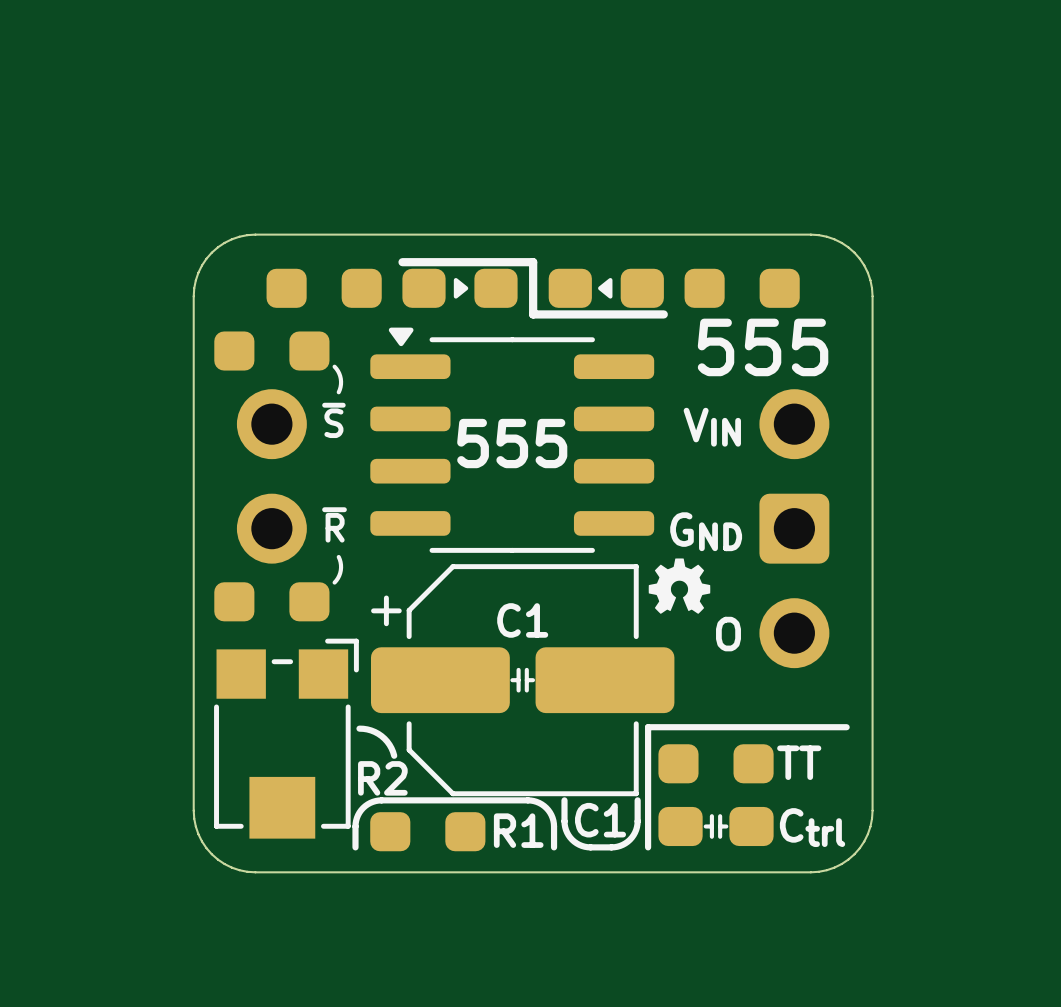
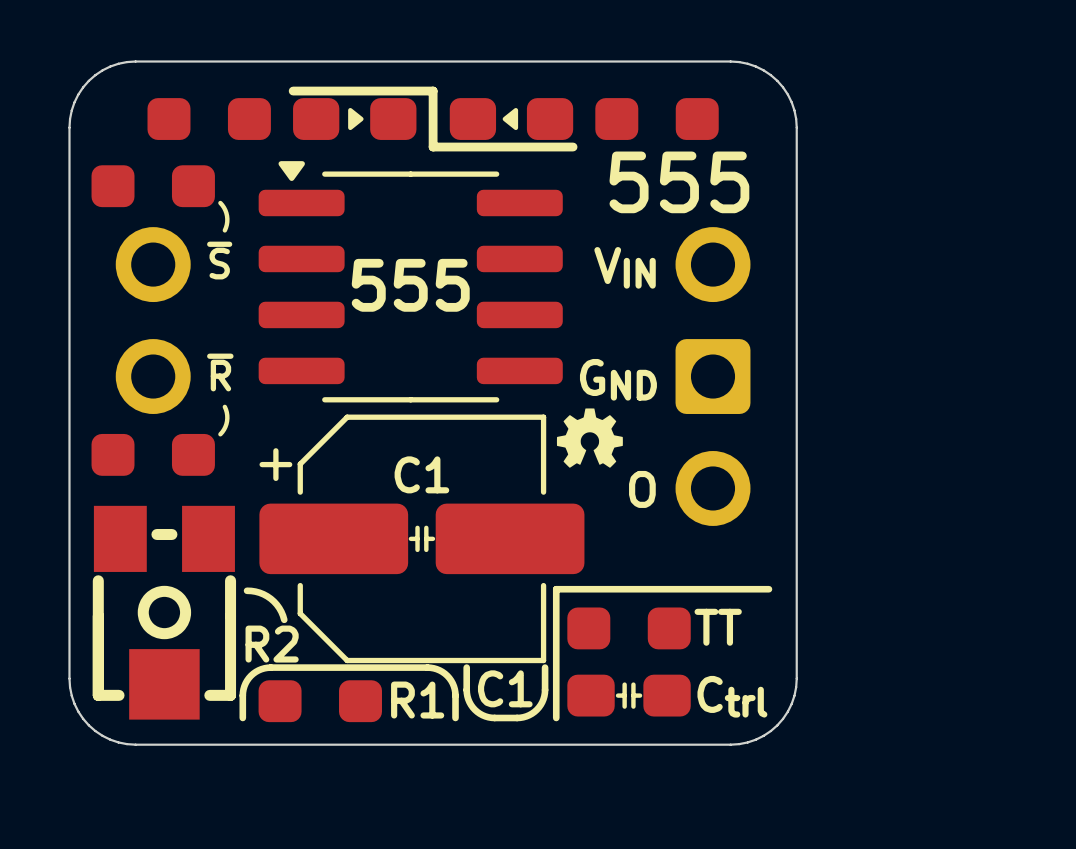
part footprint: [214, 638, 359, 839] -> [92, 505, 237, 720]

